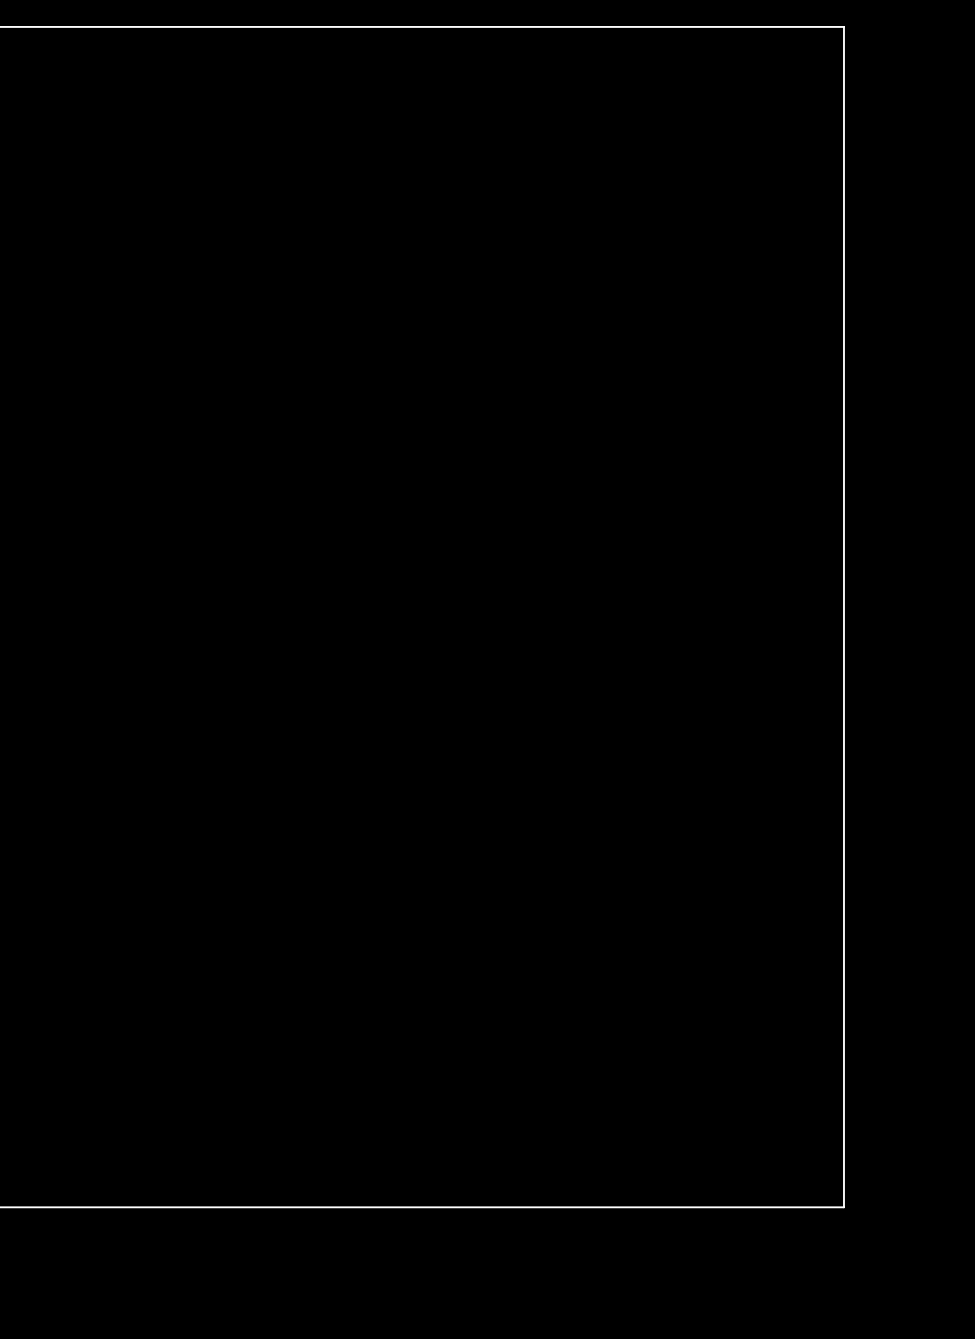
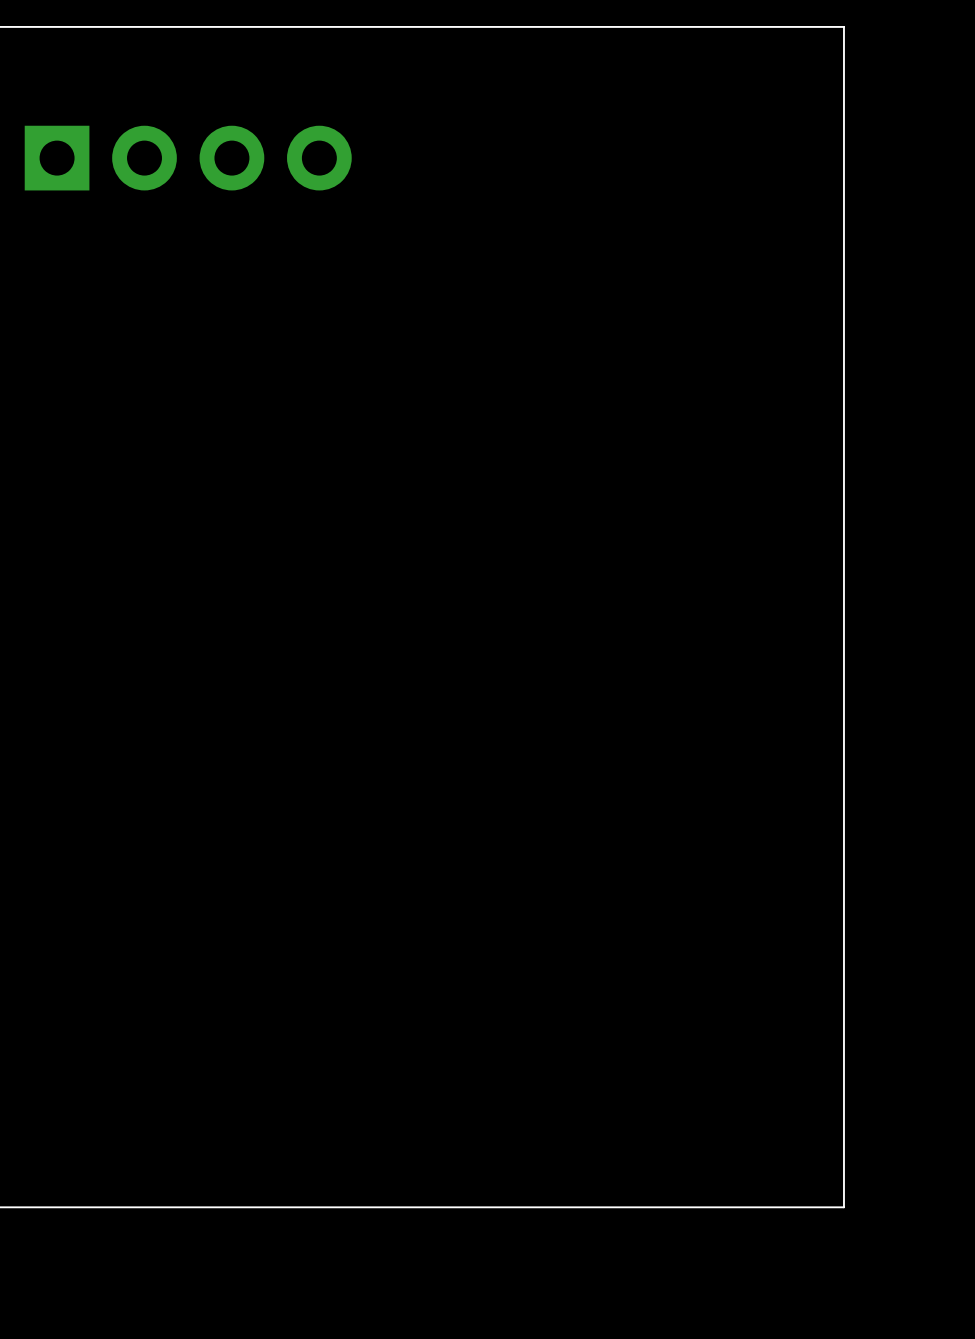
part: none -> (188, 158)

